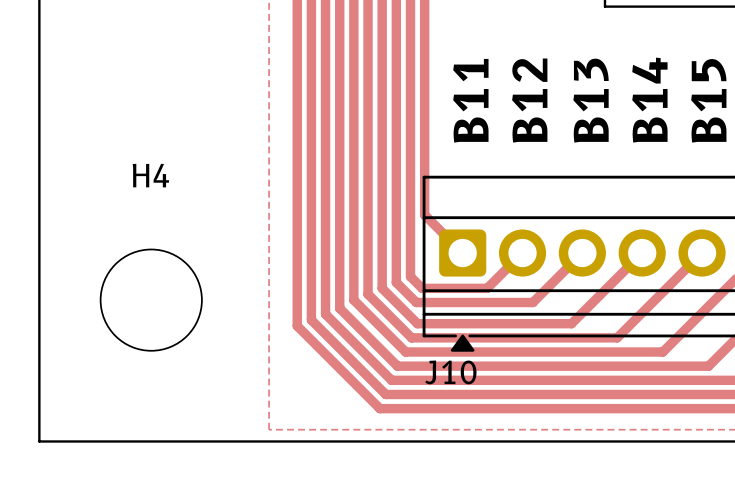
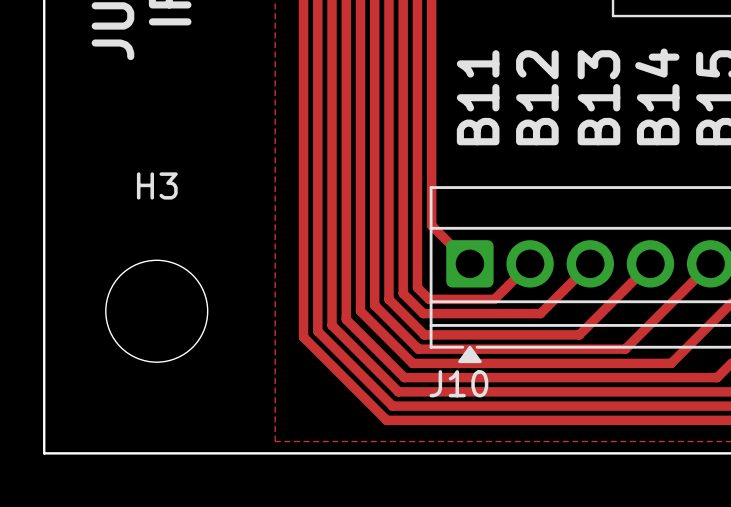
H4 name: H4 (150, 175) -> H3 (157, 185)

